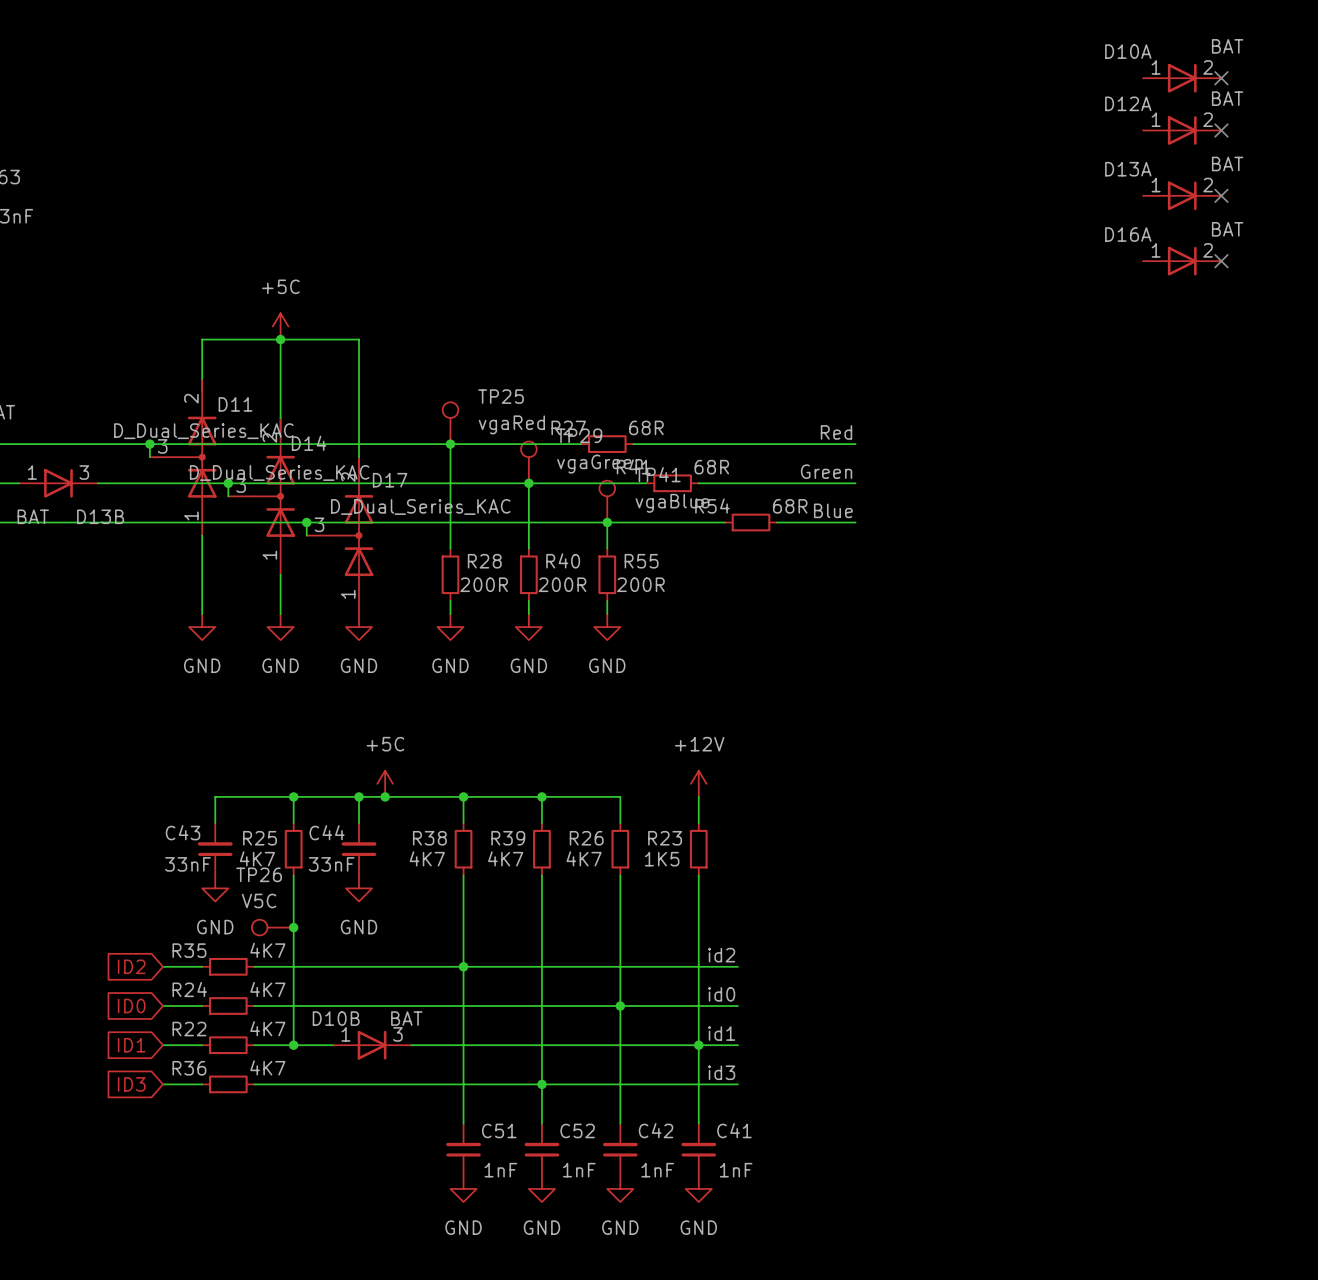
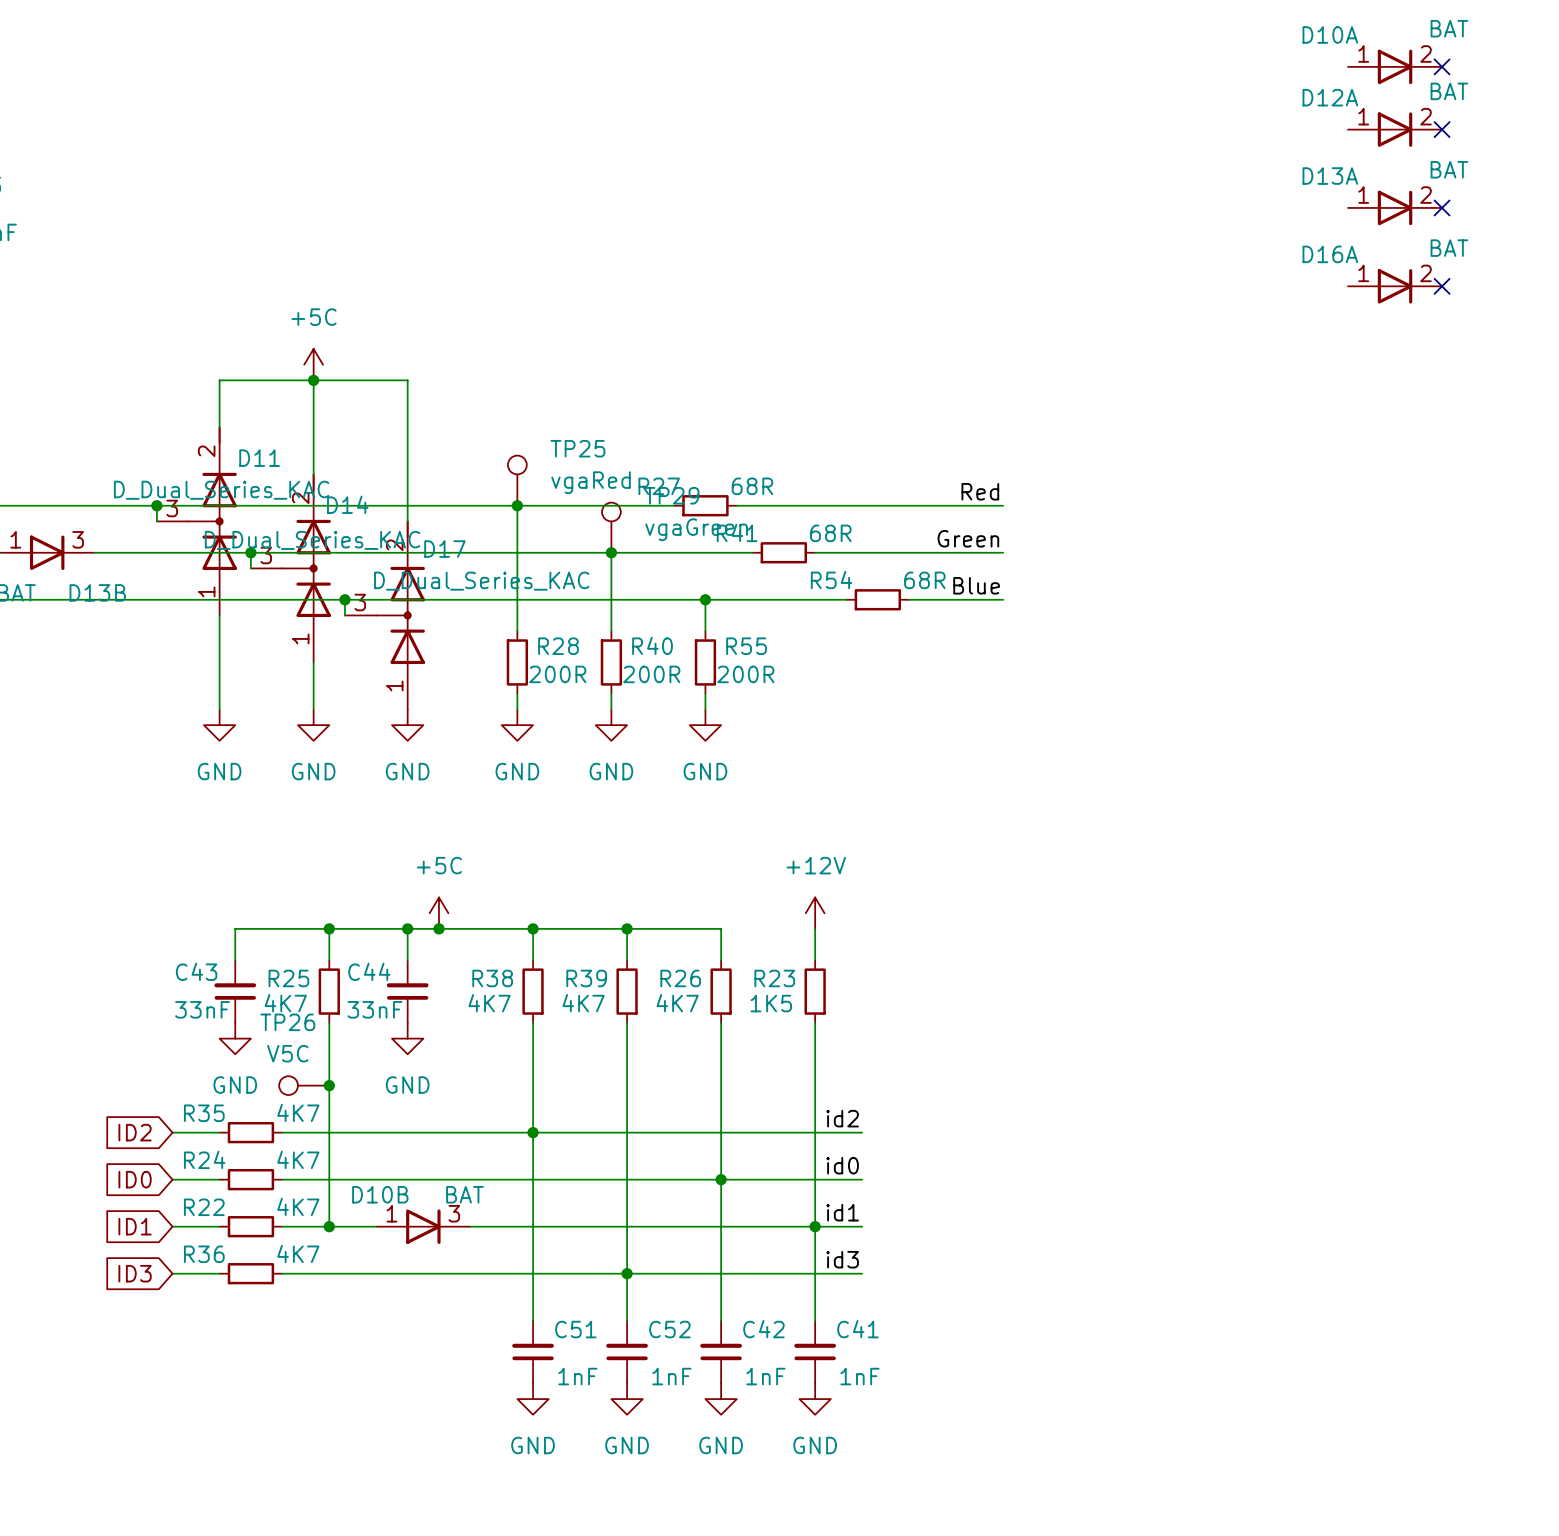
TP41: vgaBlue (607, 501) -> none

